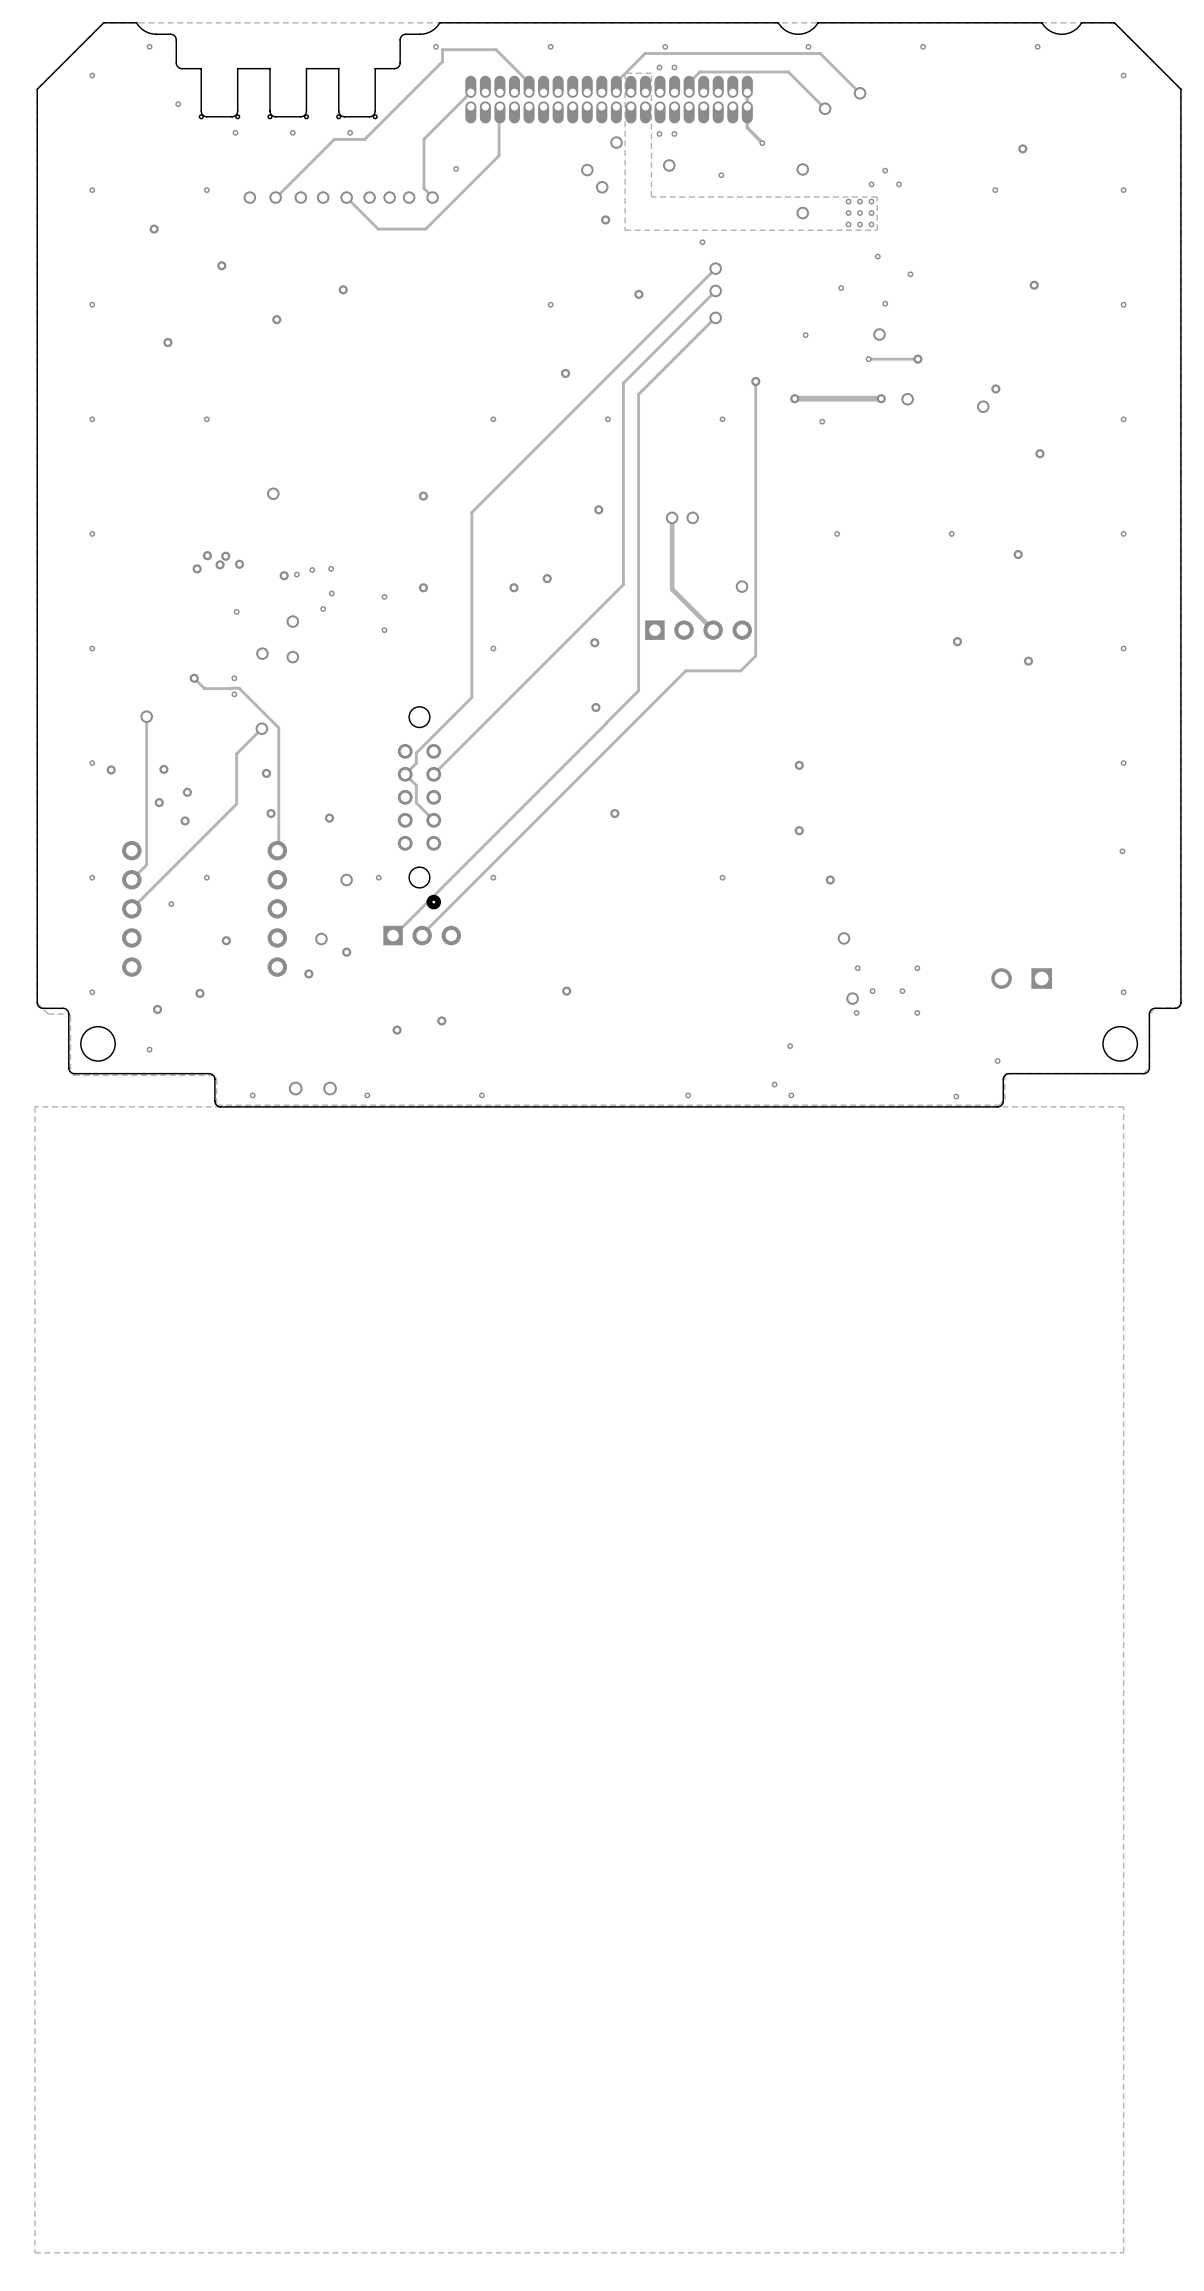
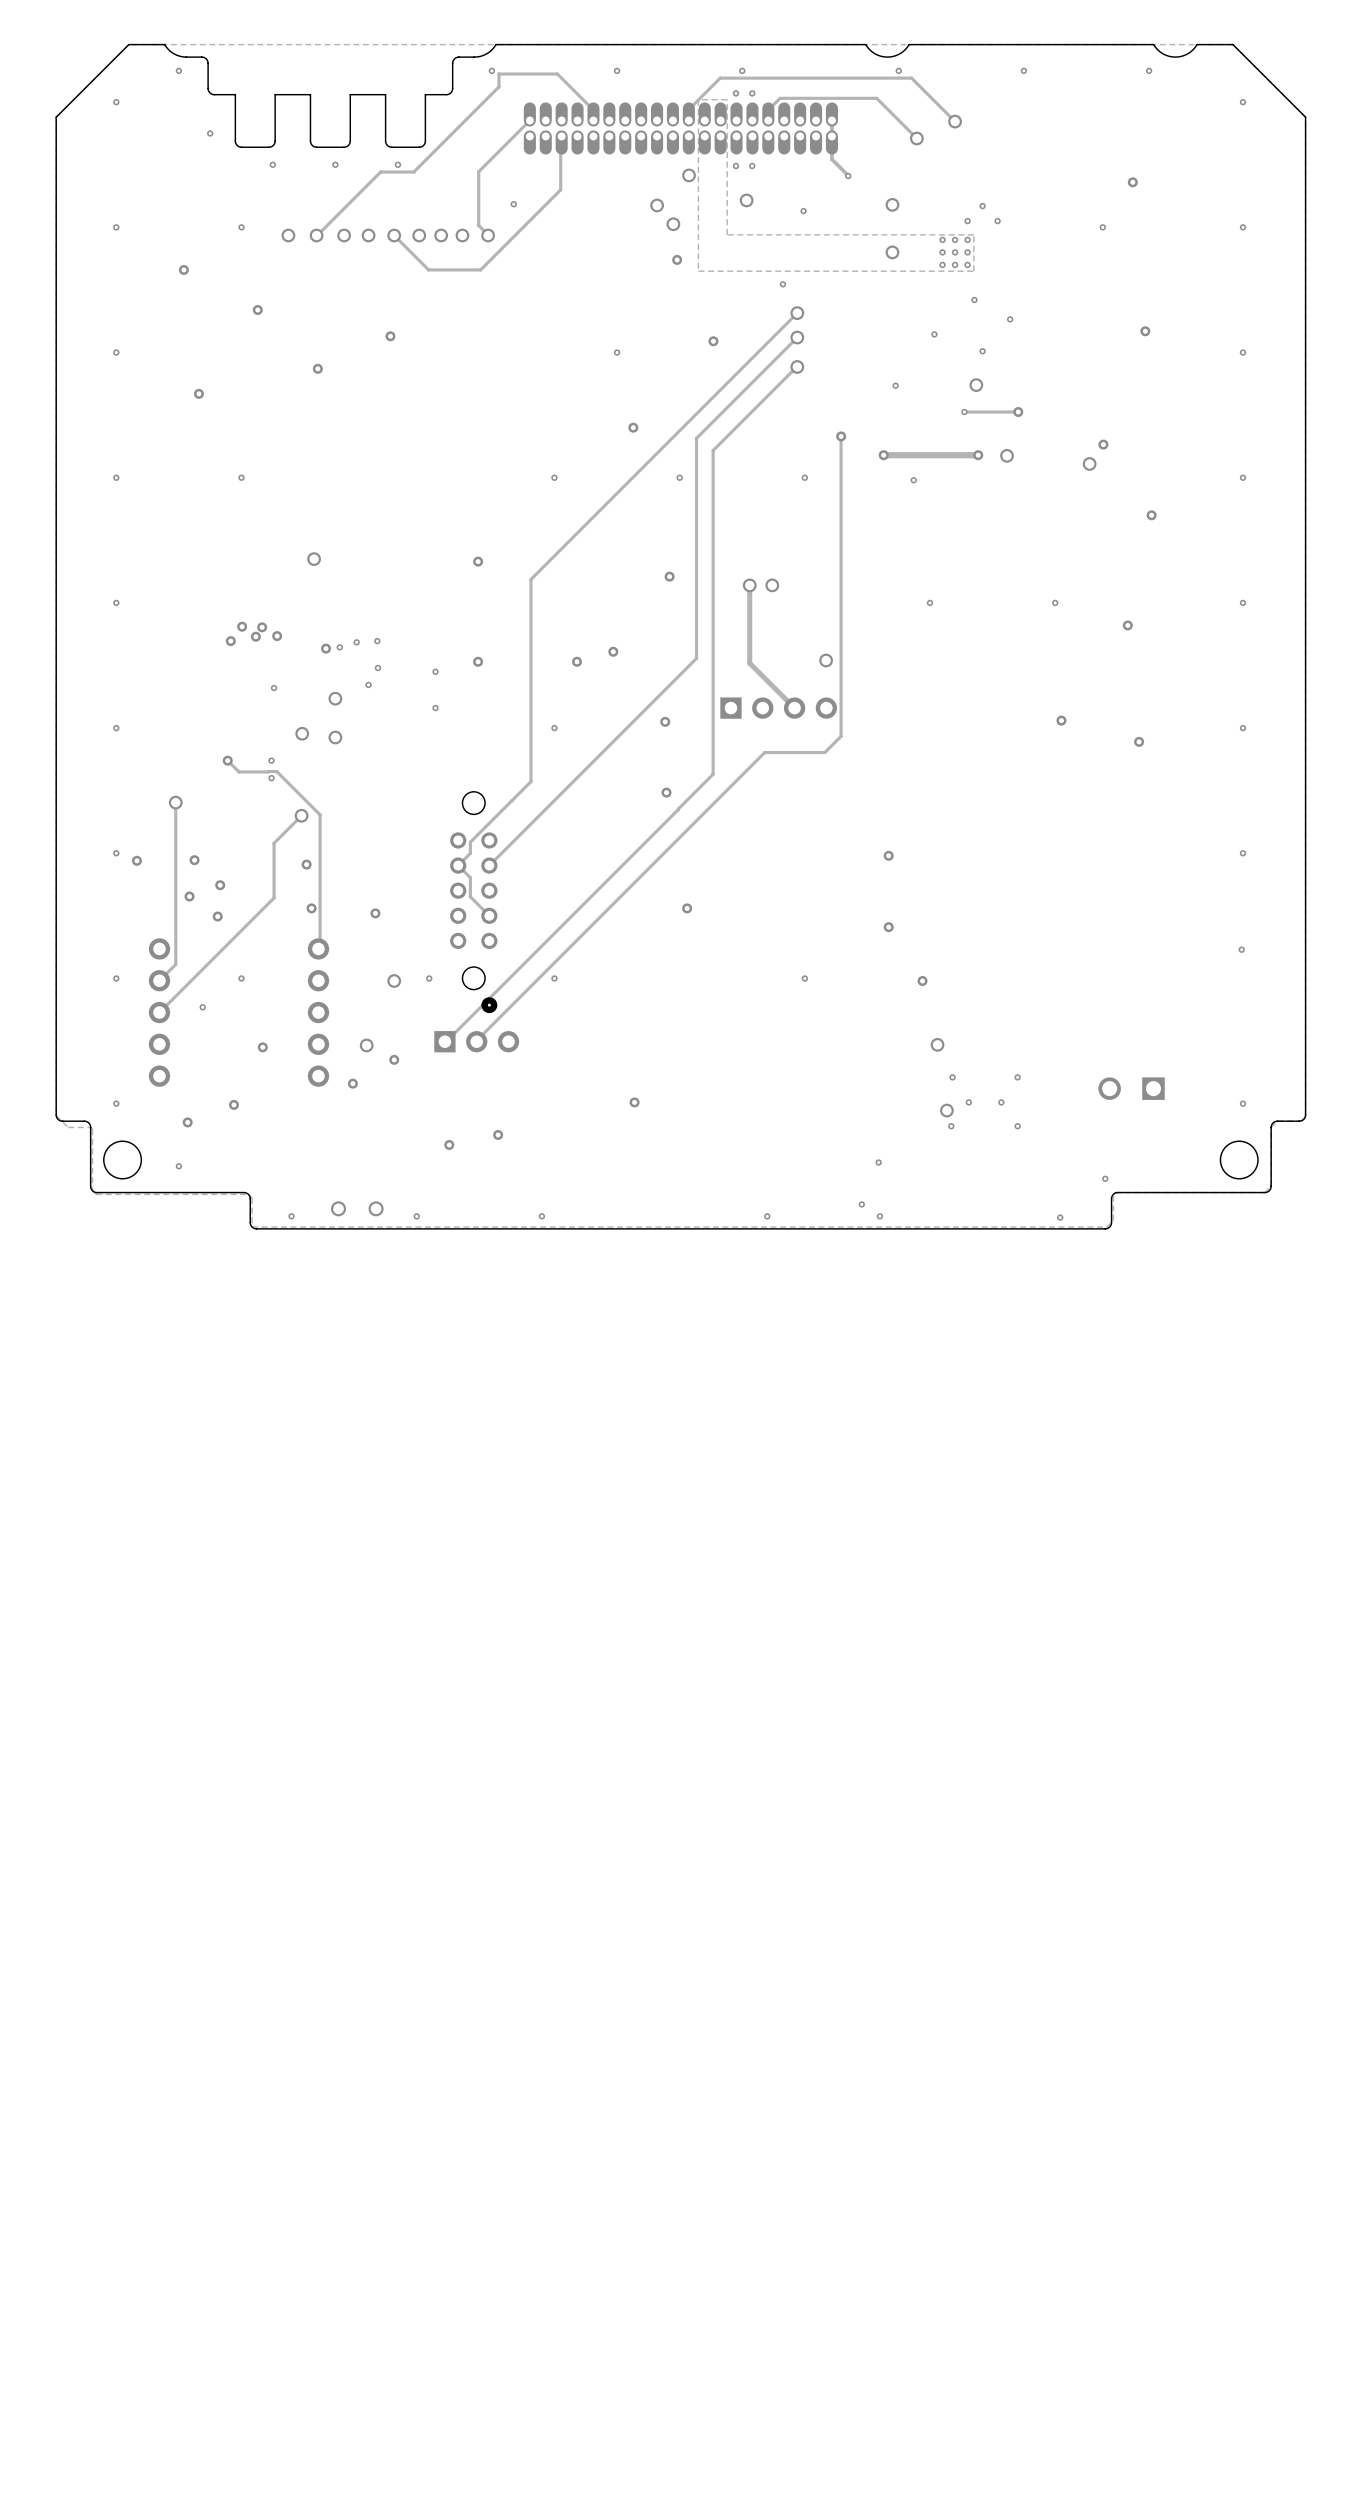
part footprint: [37, 22, 1181, 1107] -> [56, 44, 1306, 1229]
zone outline: (1123, 1106) (1123, 2252) (34, 2252) (34, 1106) (1123, 1106) -> none

